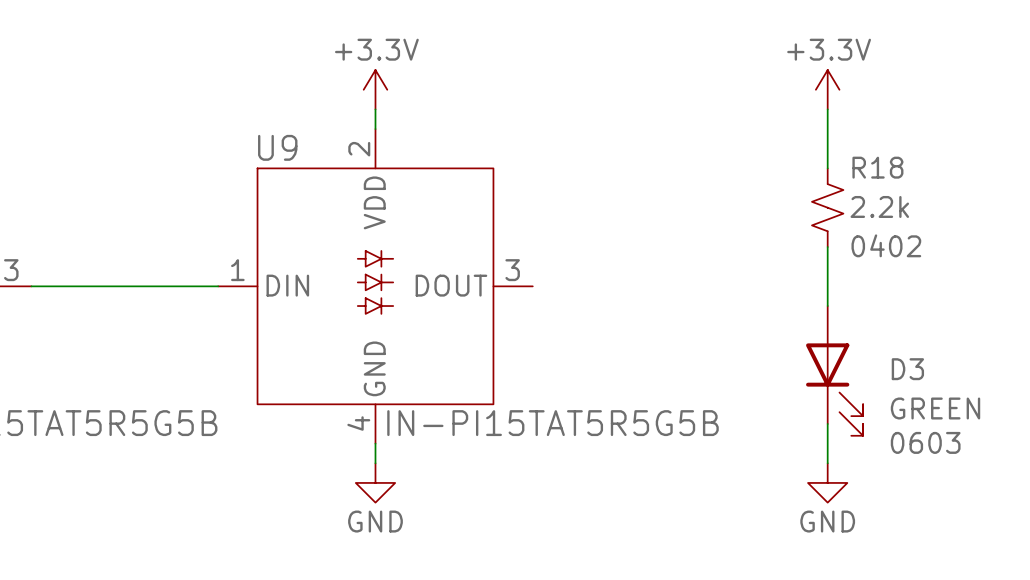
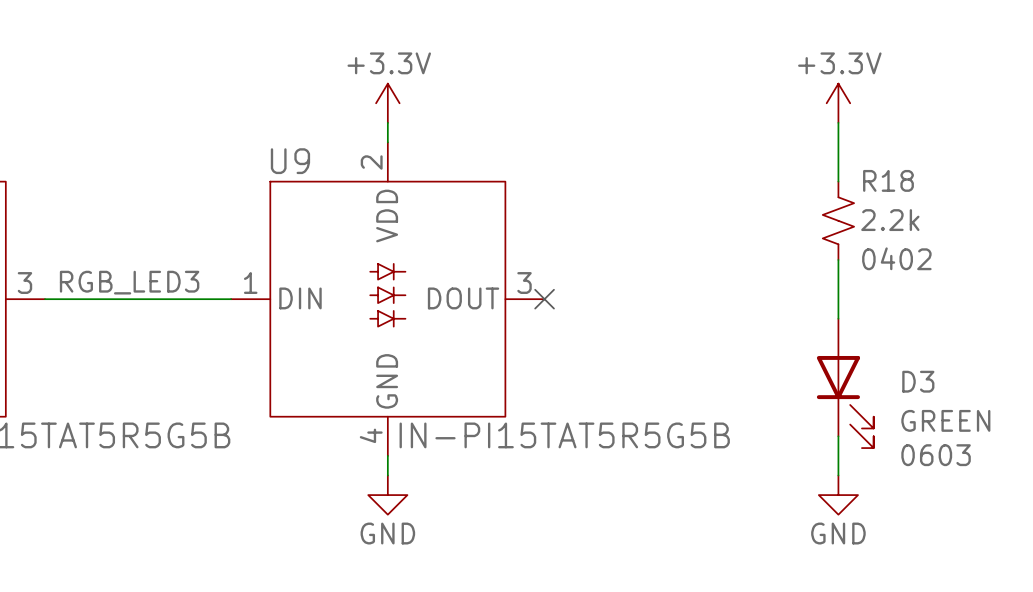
label: none -> RGB_LED3 (129, 282)
no-connect mark: none -> (544, 299)

